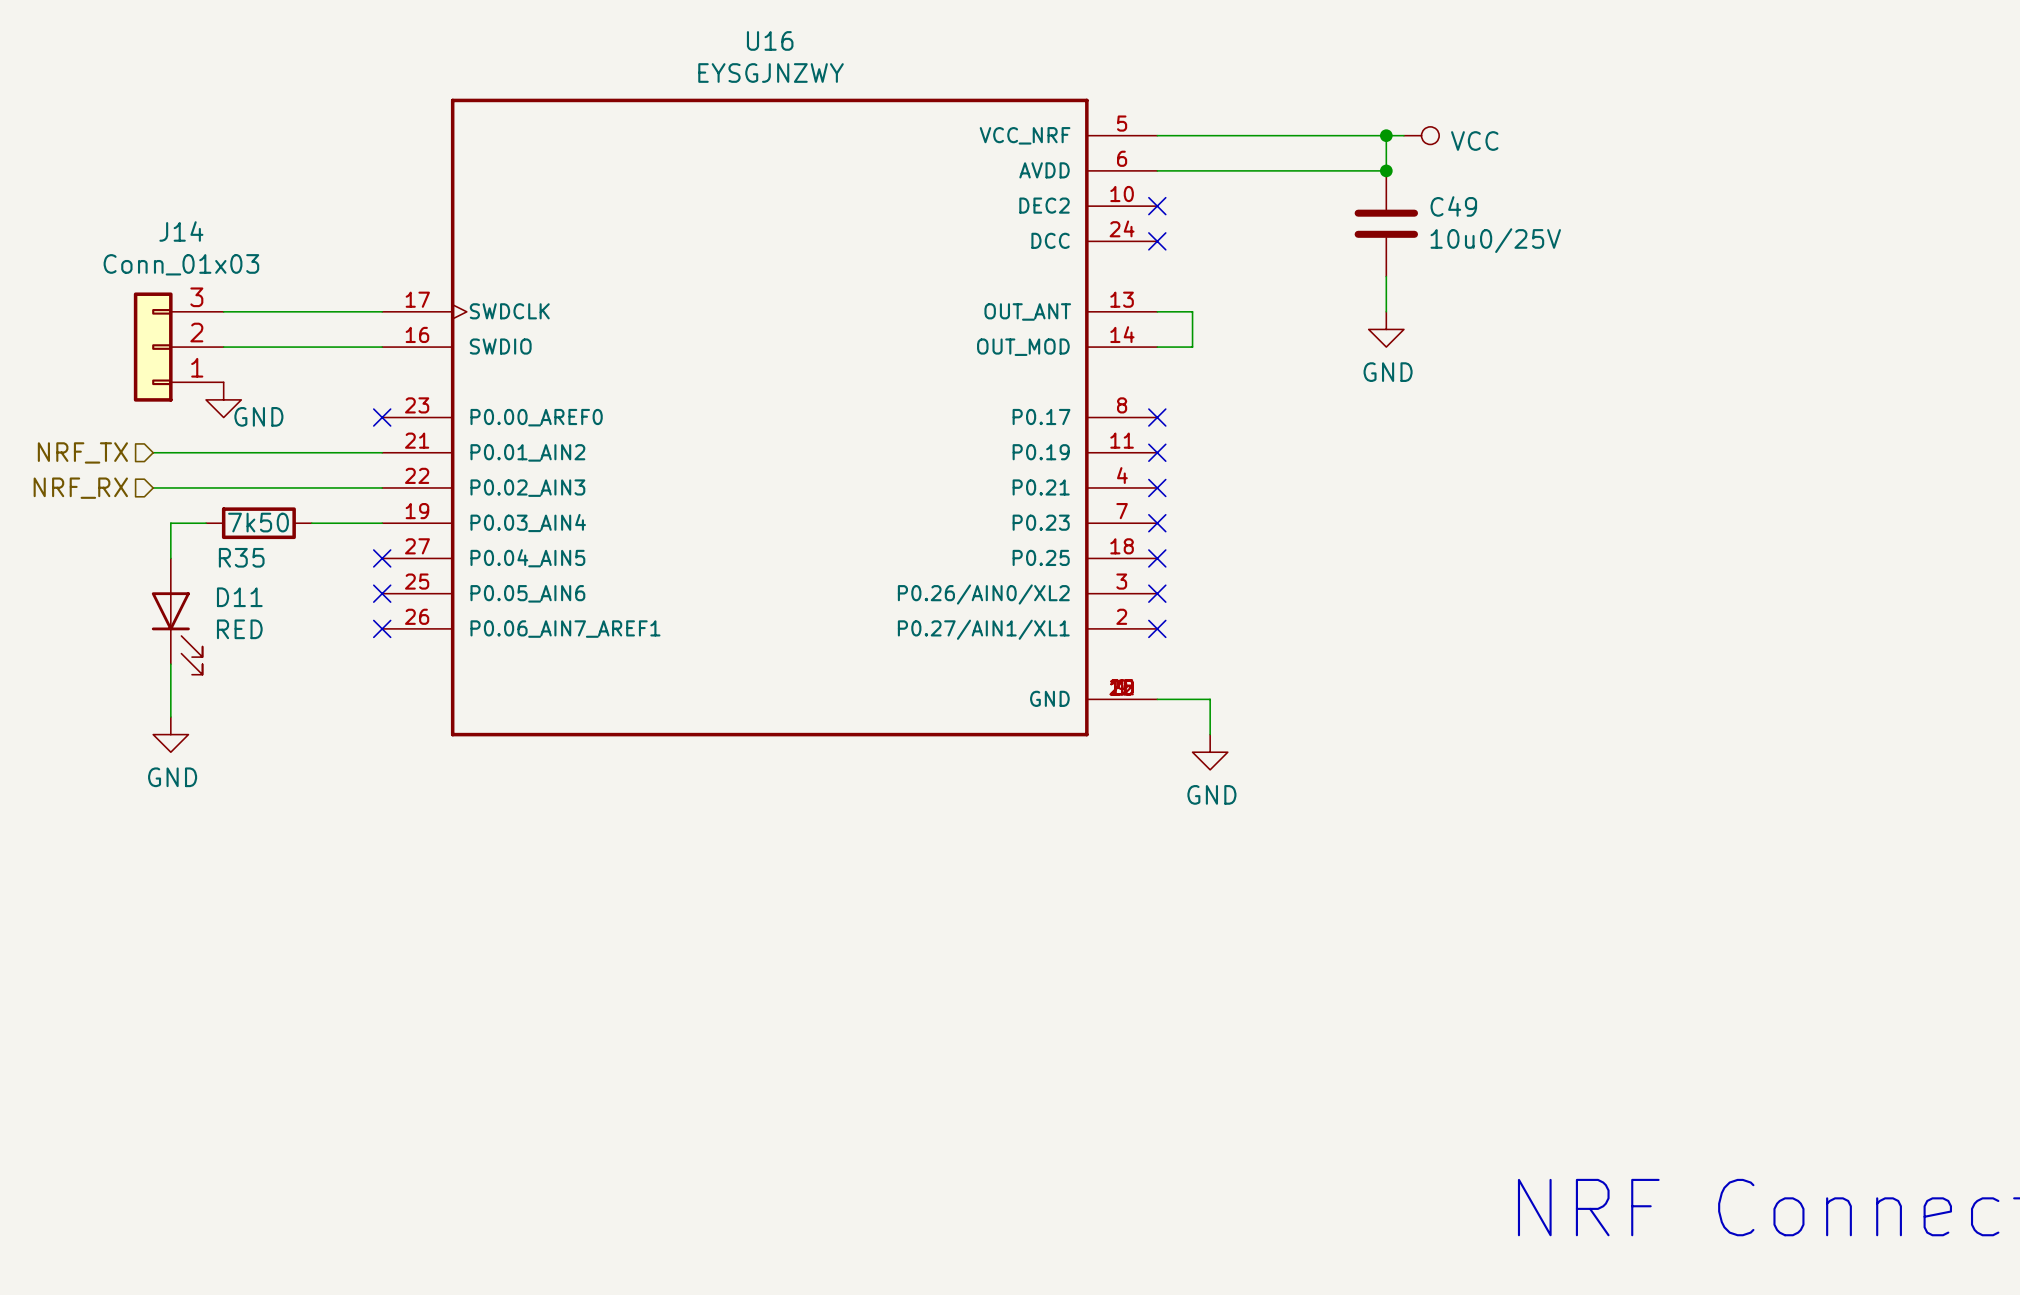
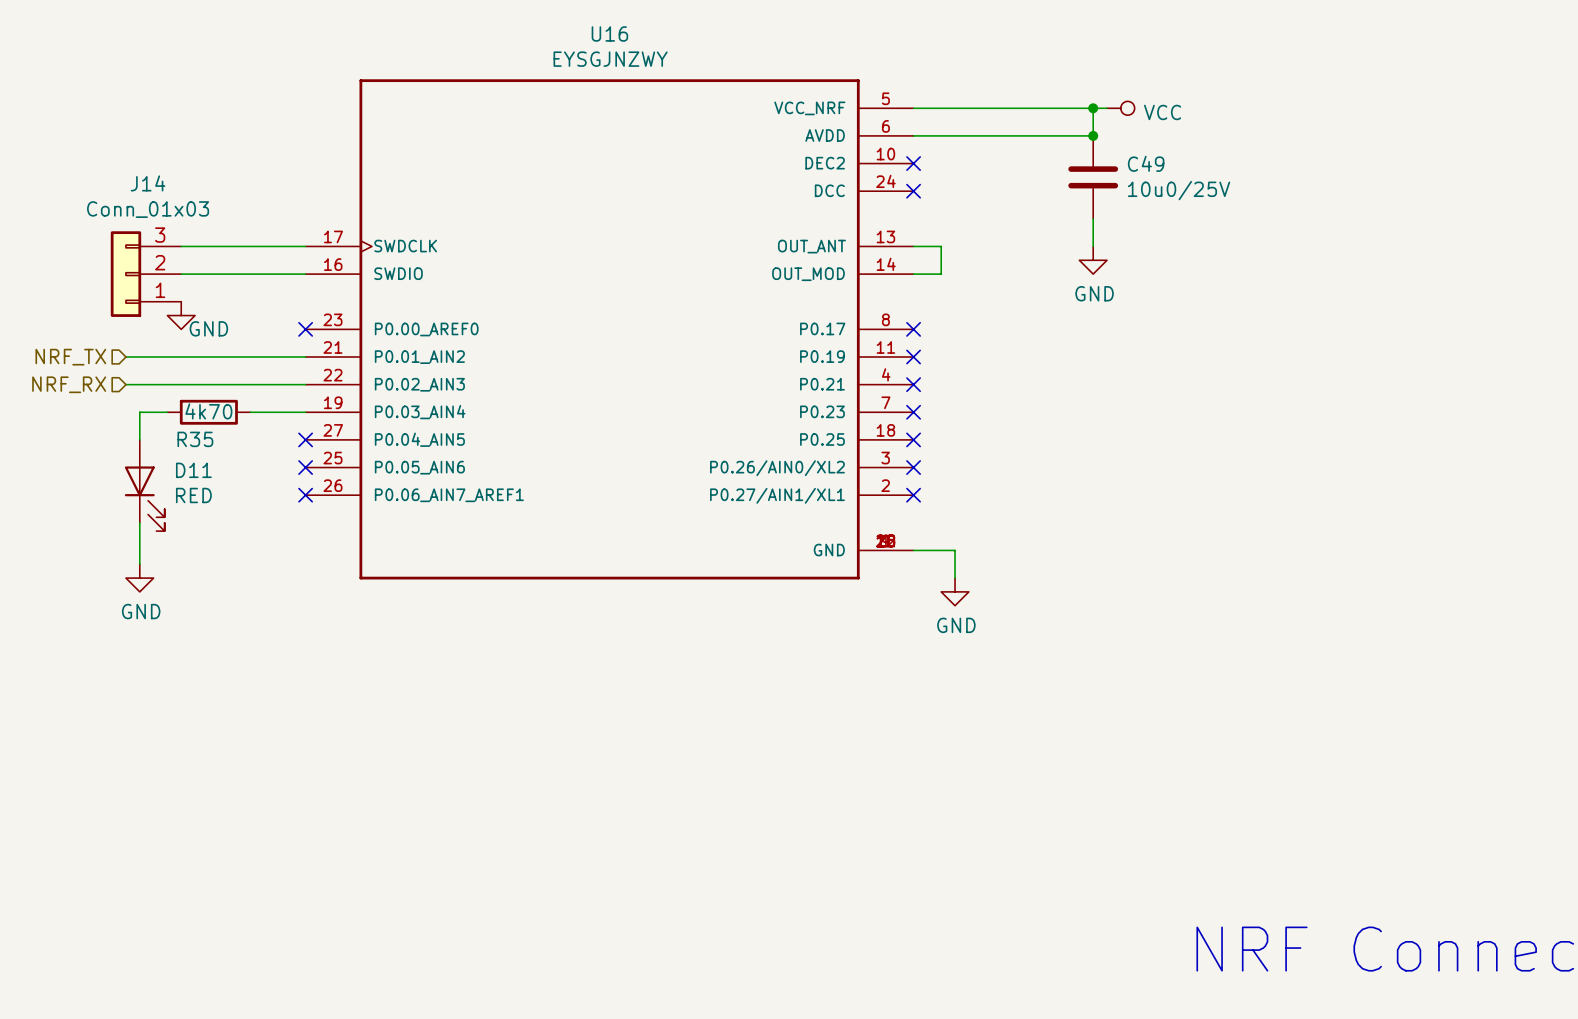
R35 value: 7k50 (258, 522) -> 4k70 (208, 411)

